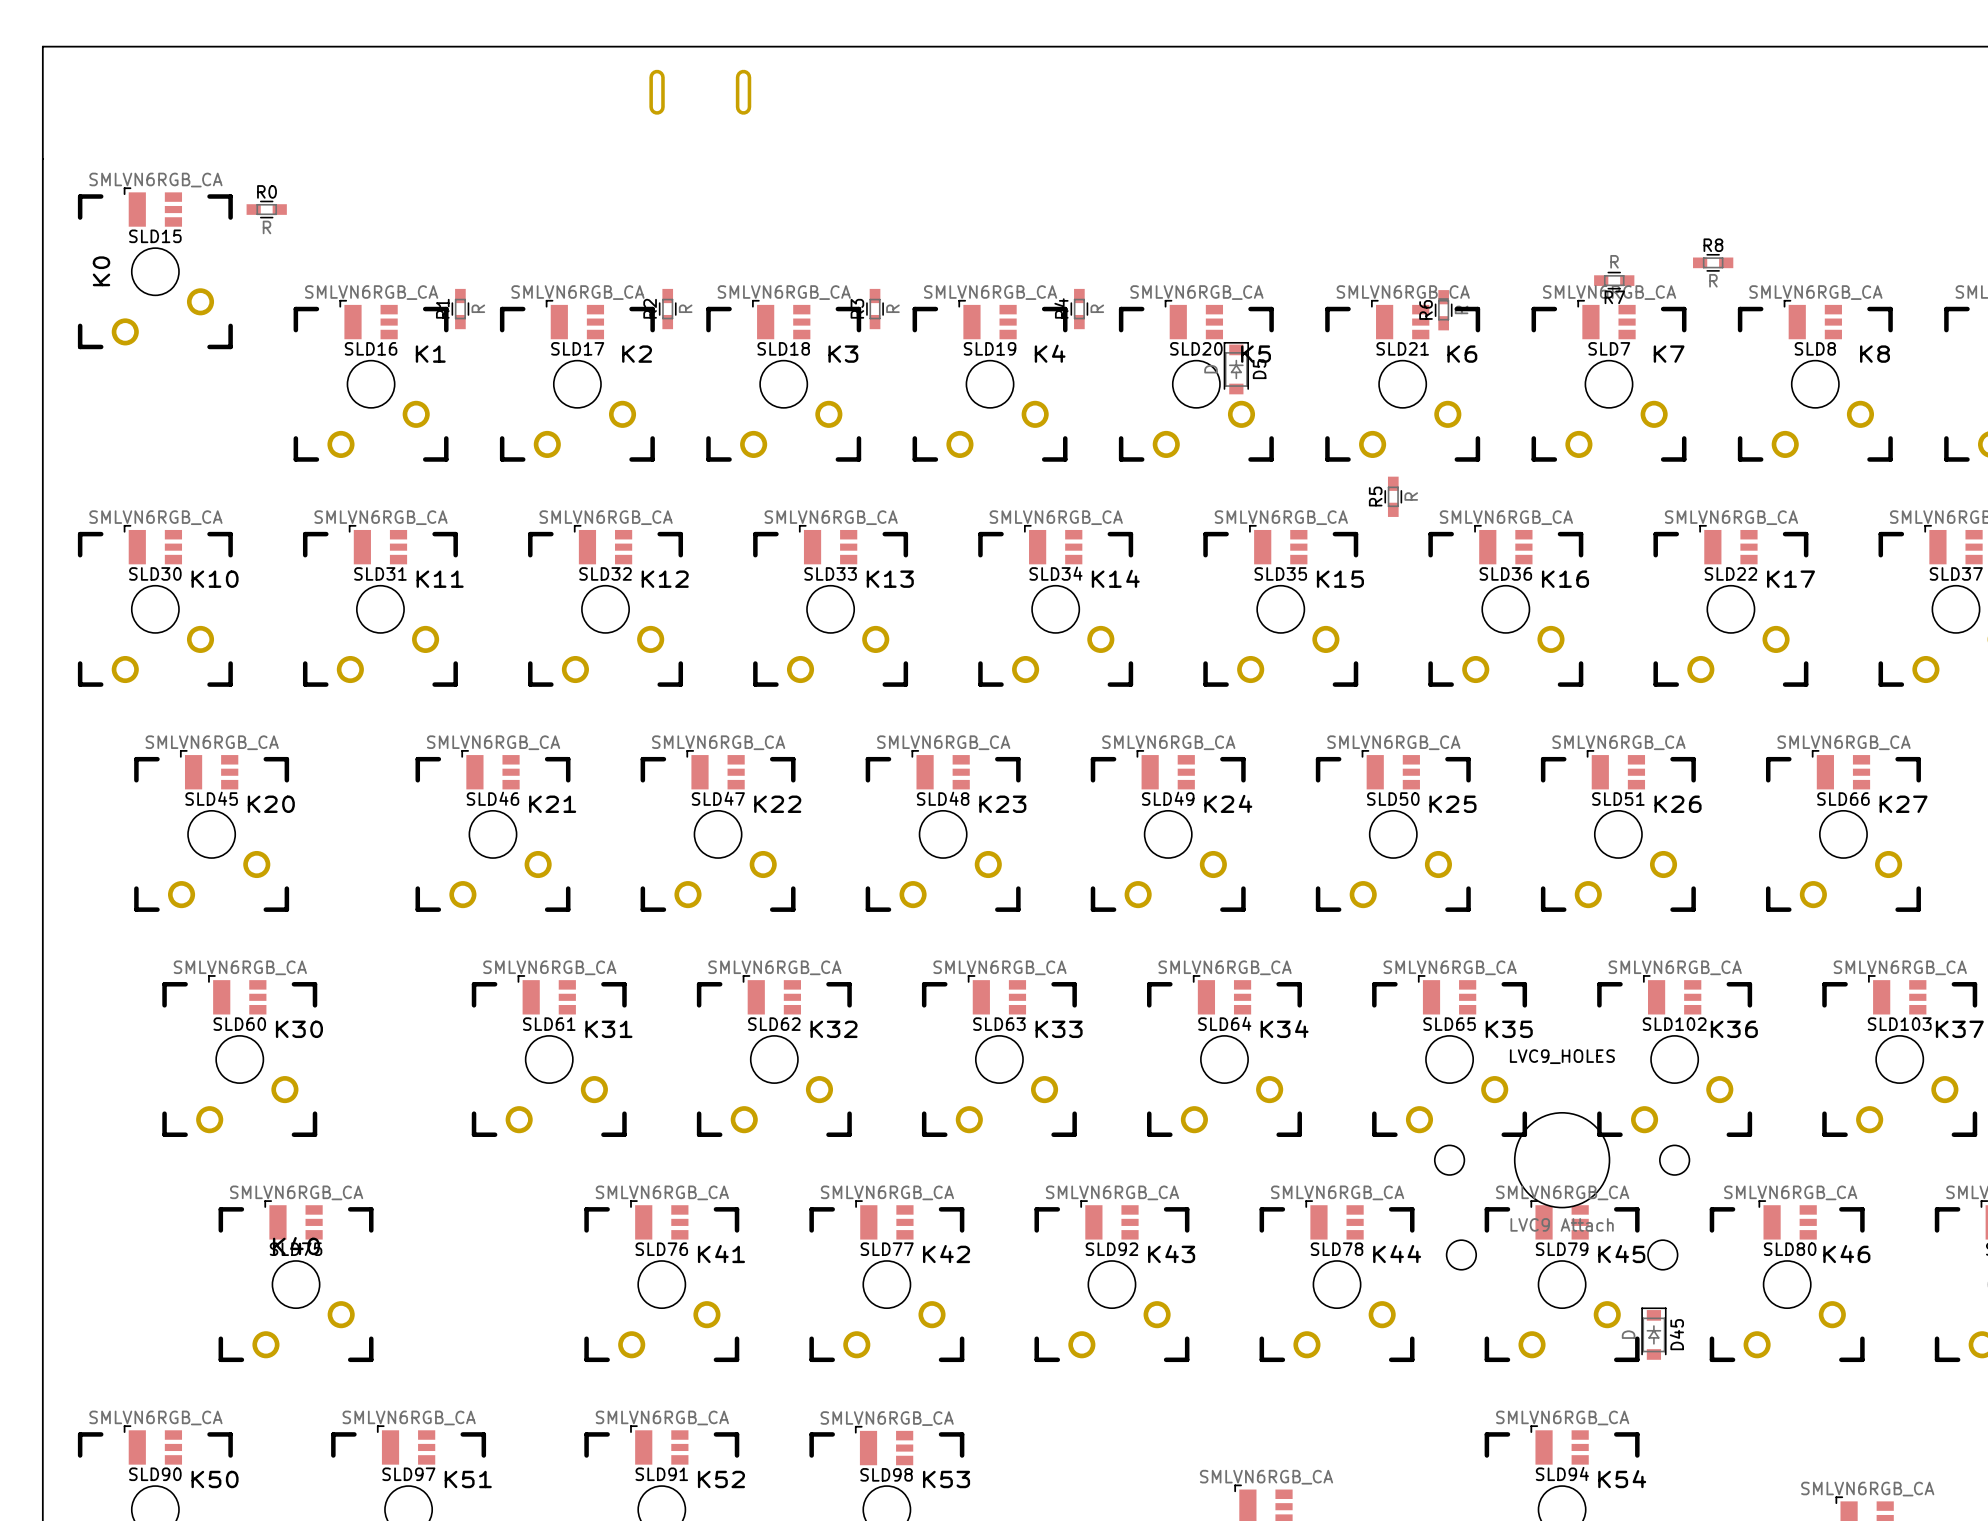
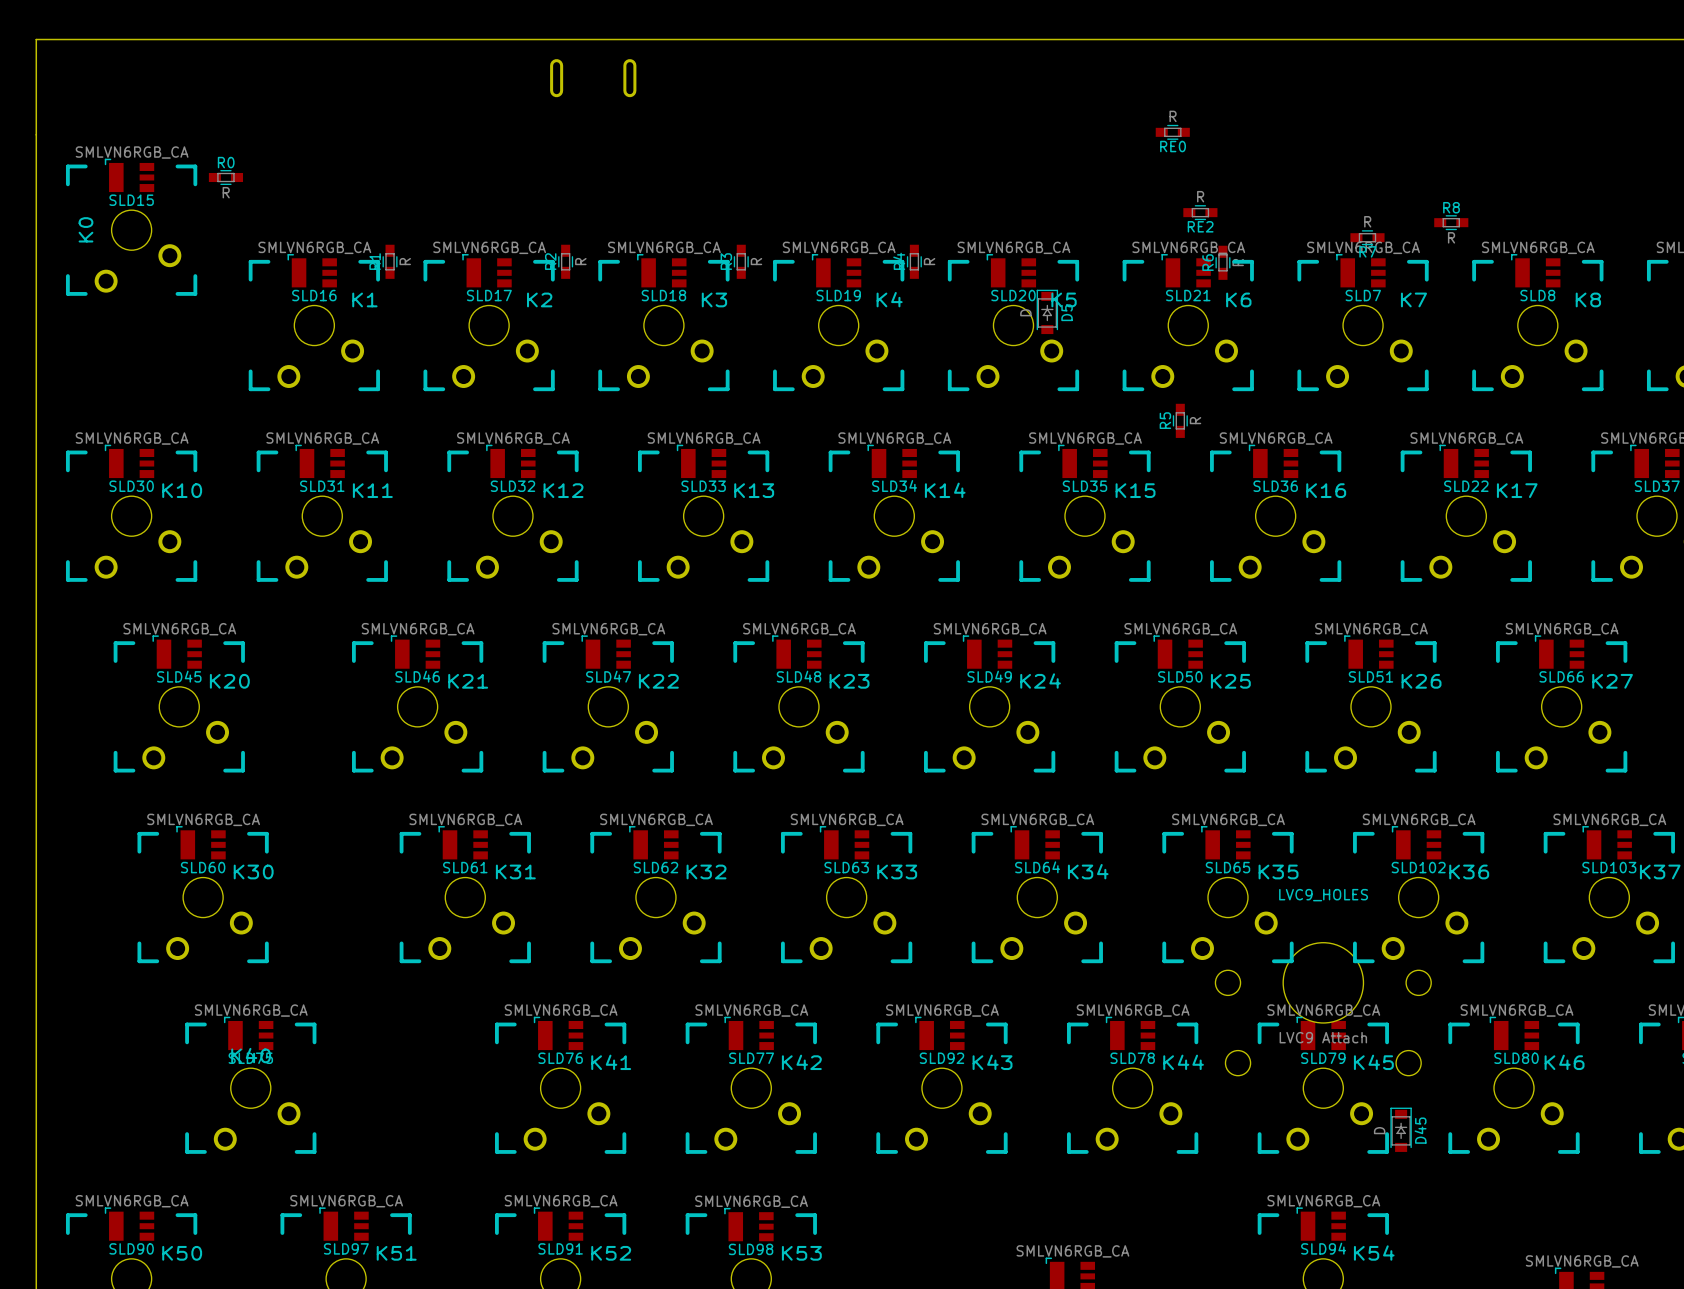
RE0: none -> R (1172, 132)
RE2: none -> R (1200, 212)

